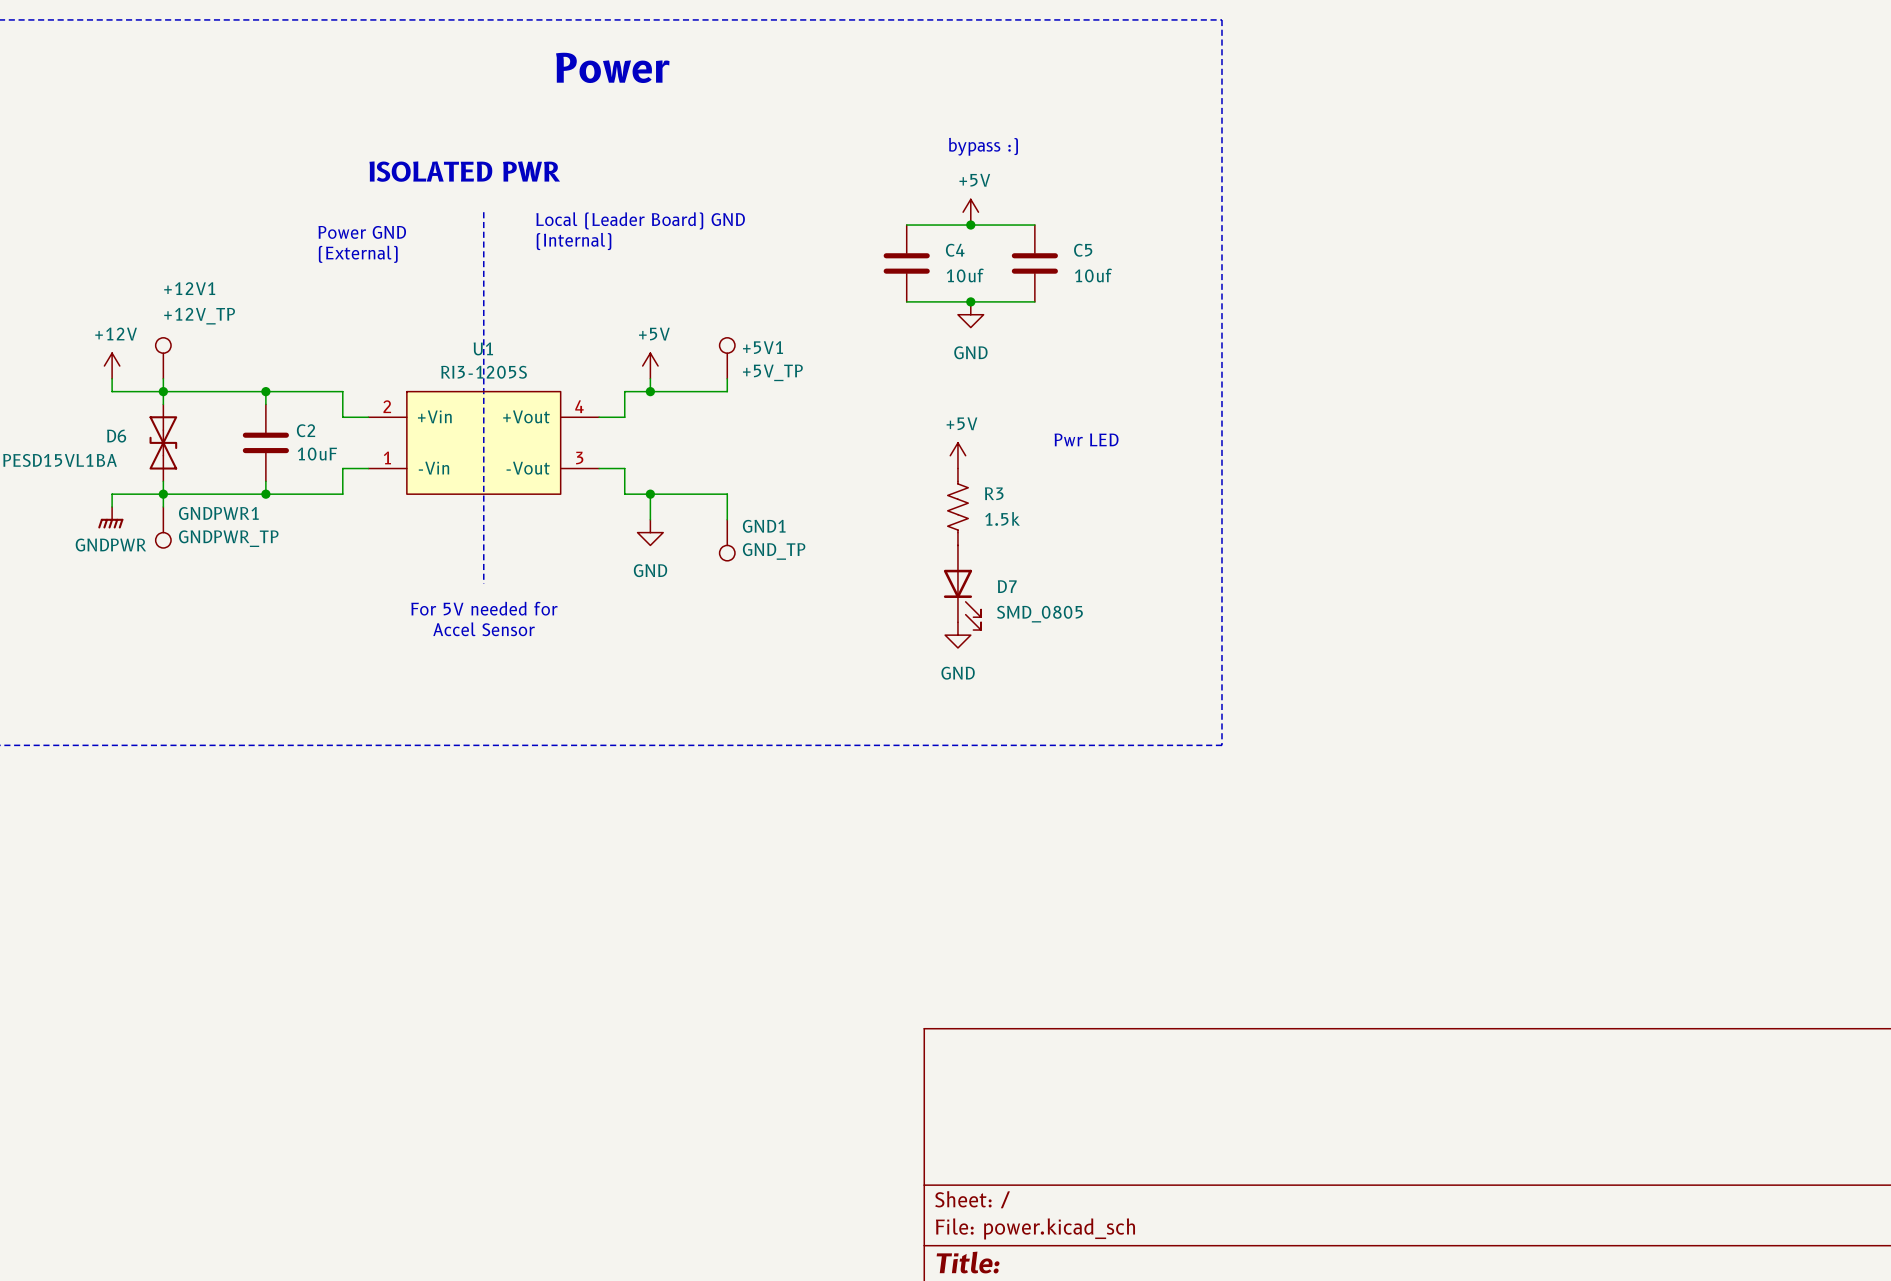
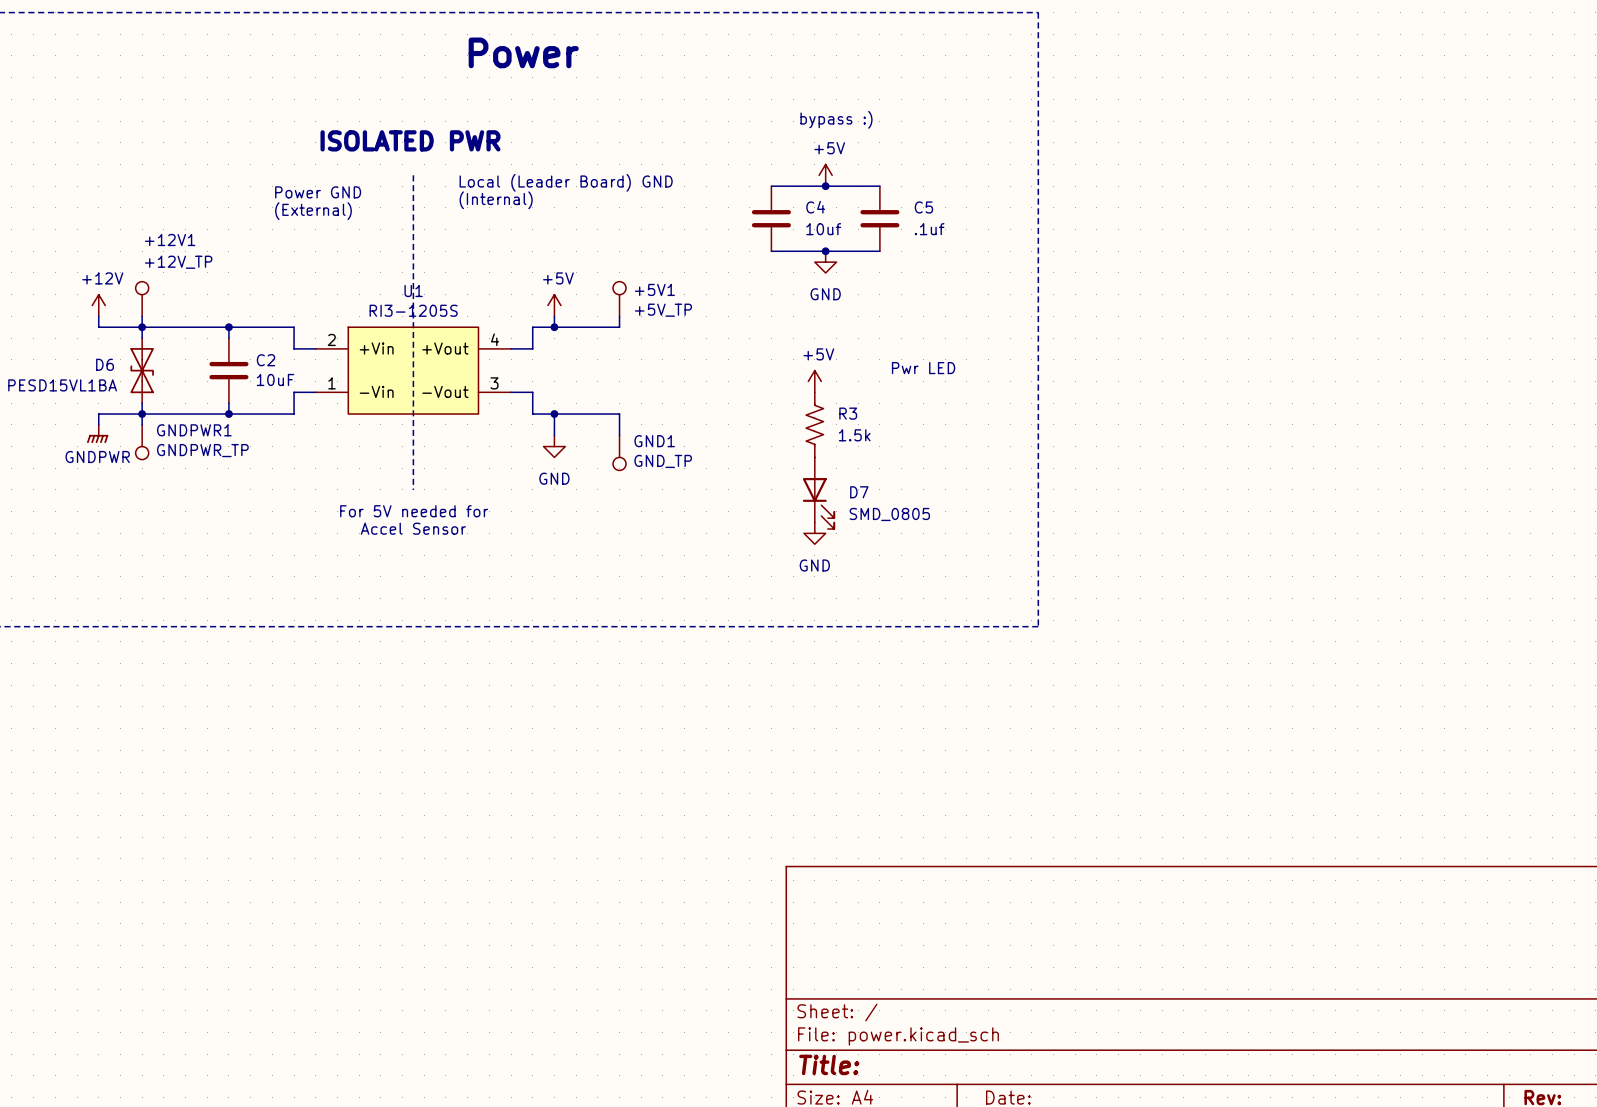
C5 value: 10uf (1093, 275) -> .1uf (929, 229)

